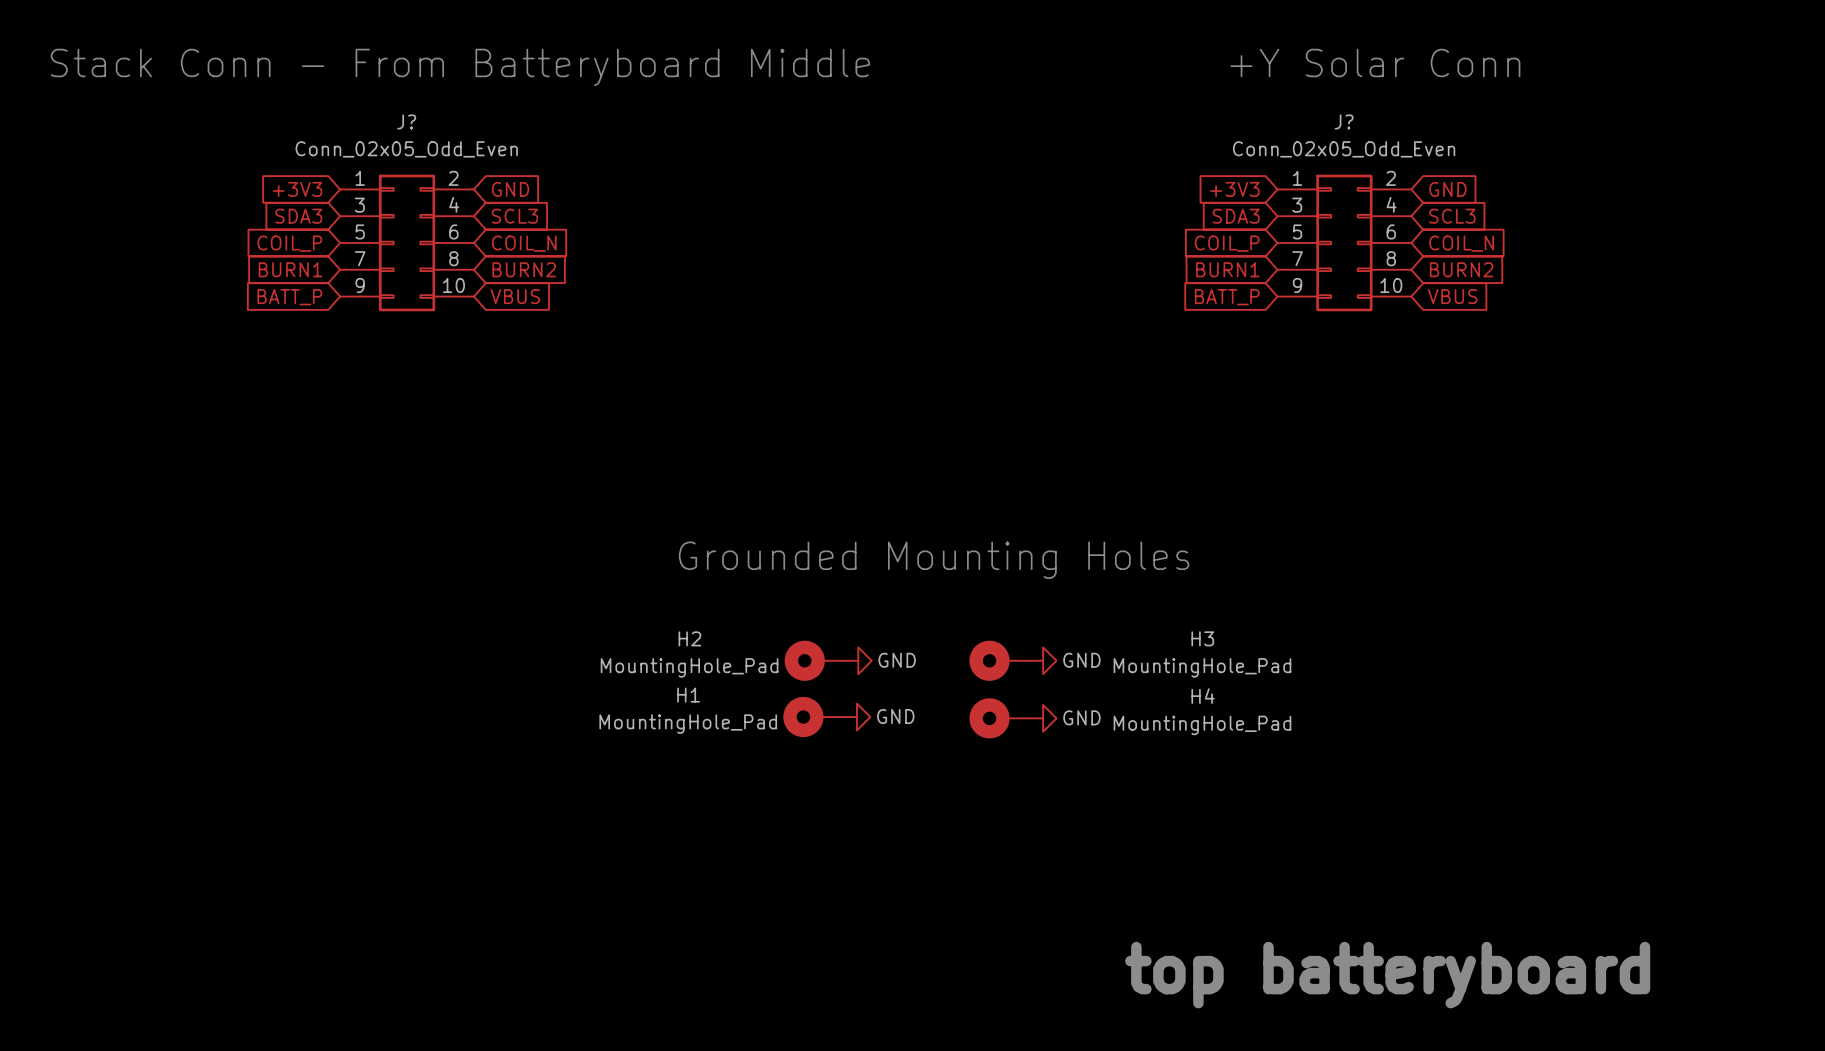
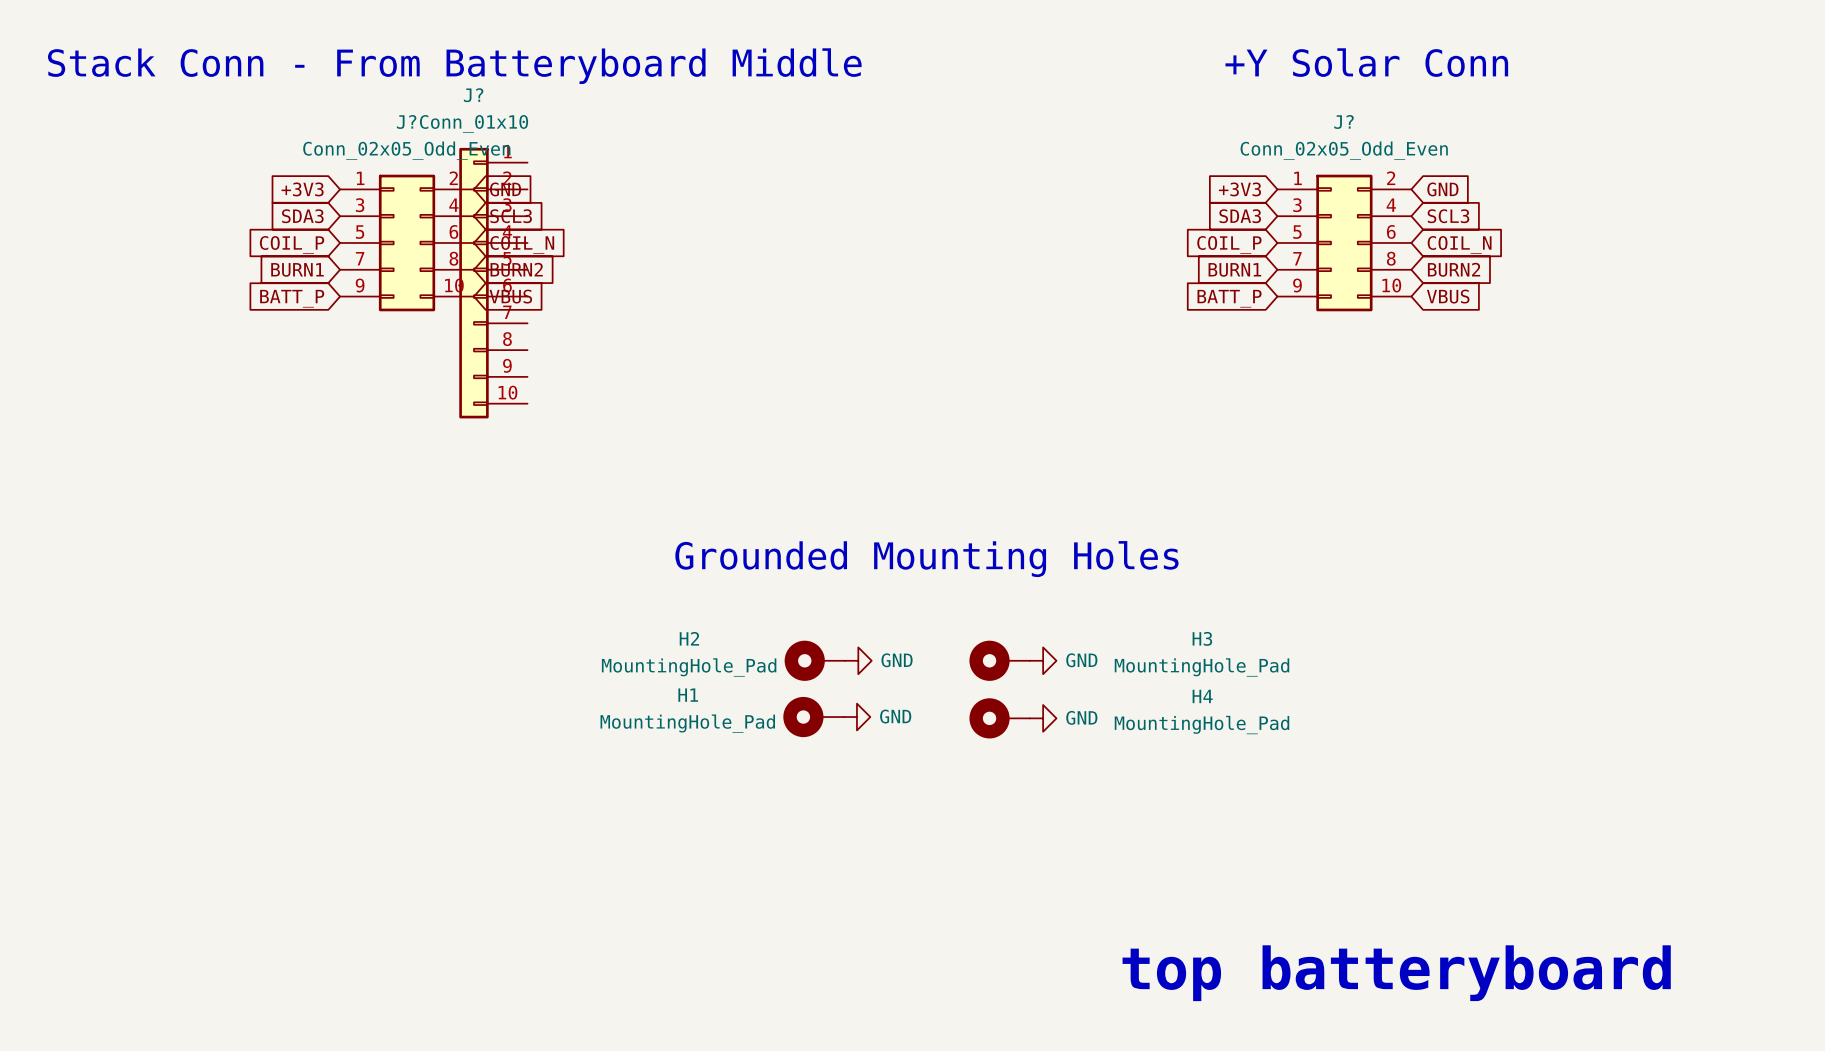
J?: none -> Conn_01x10 (493, 283)

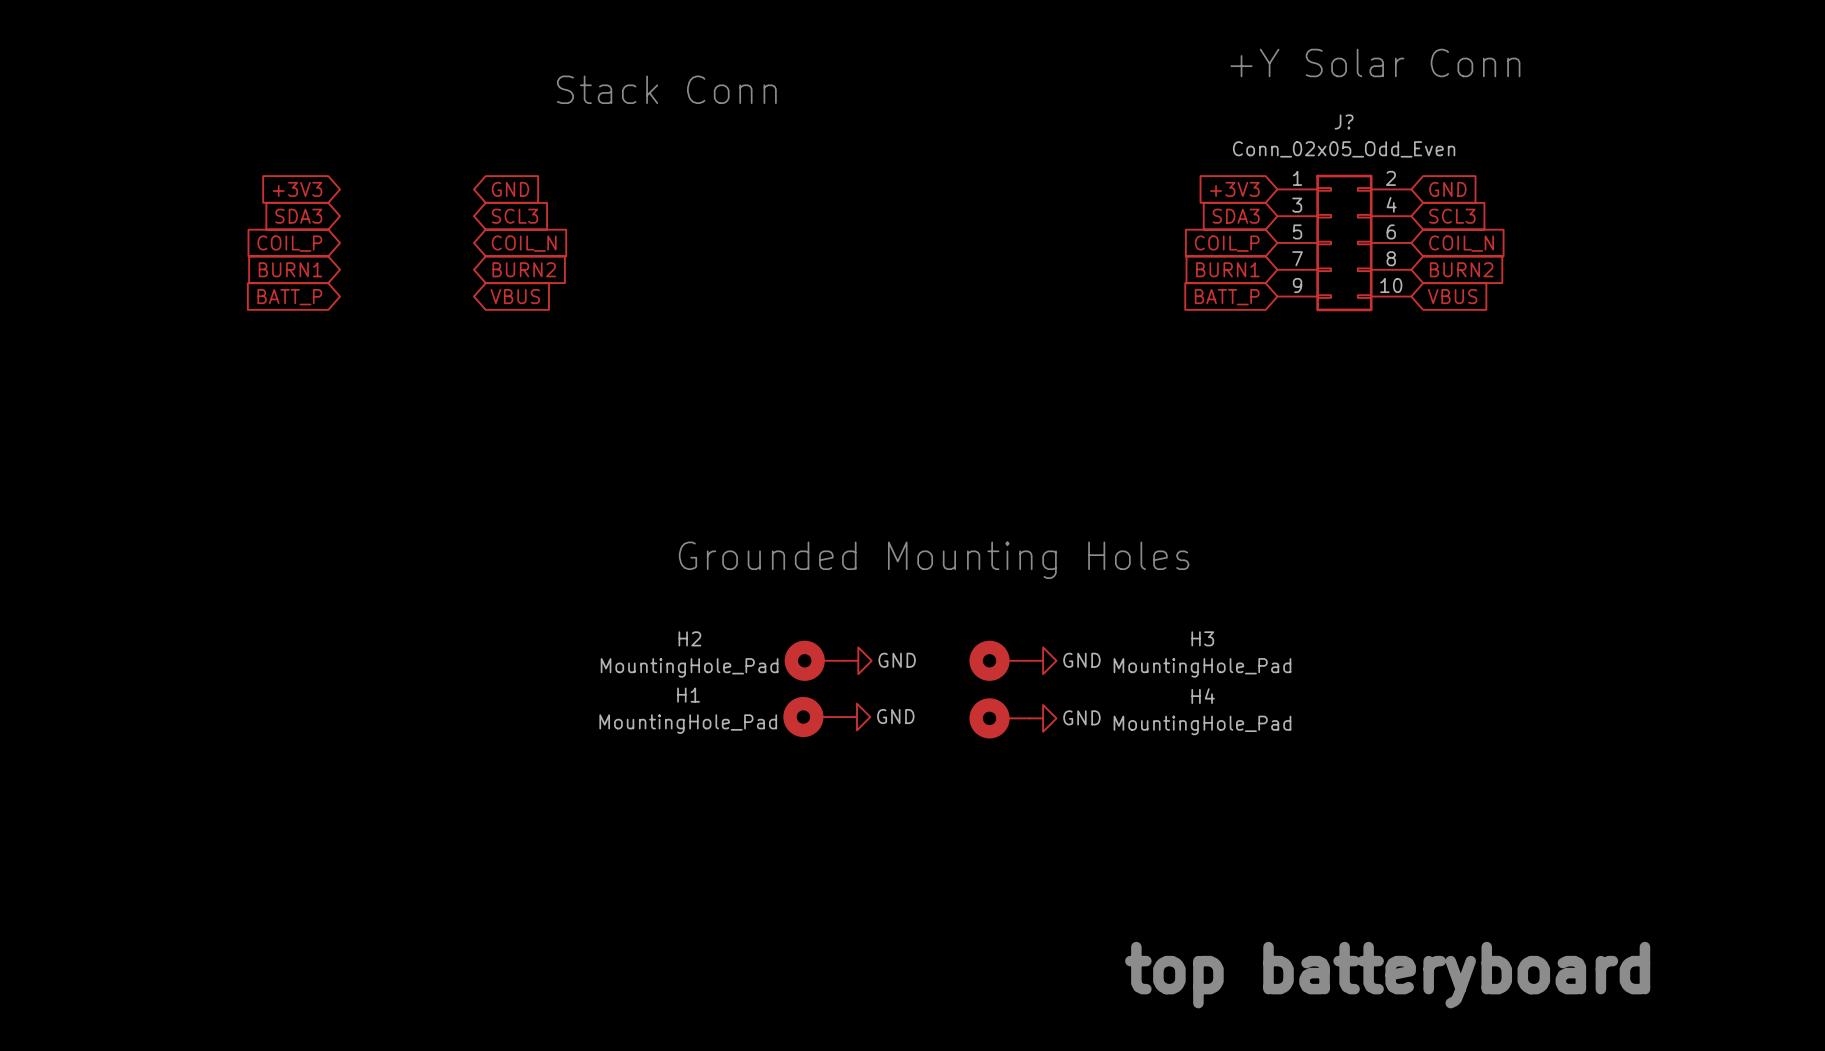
text: Stack Conn - From Batteryboard Middle (454, 66) -> none
text: none -> Stack Conn (666, 89)
J?: Conn_02x05_Odd_Even (407, 242) -> none
J?: Conn_01x10 (493, 283) -> none

